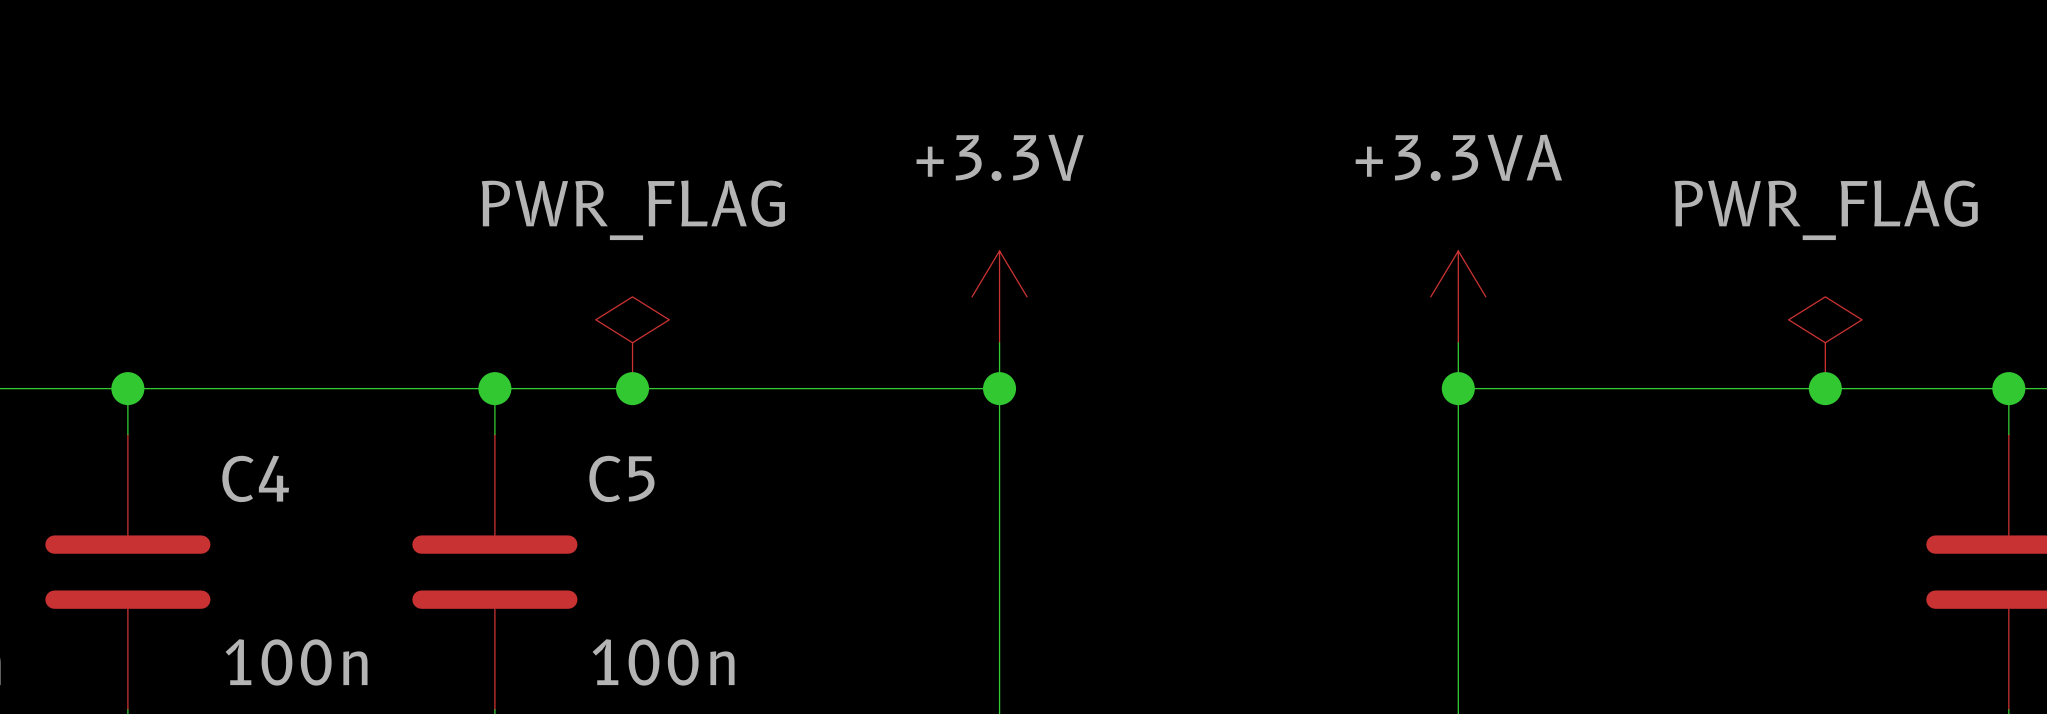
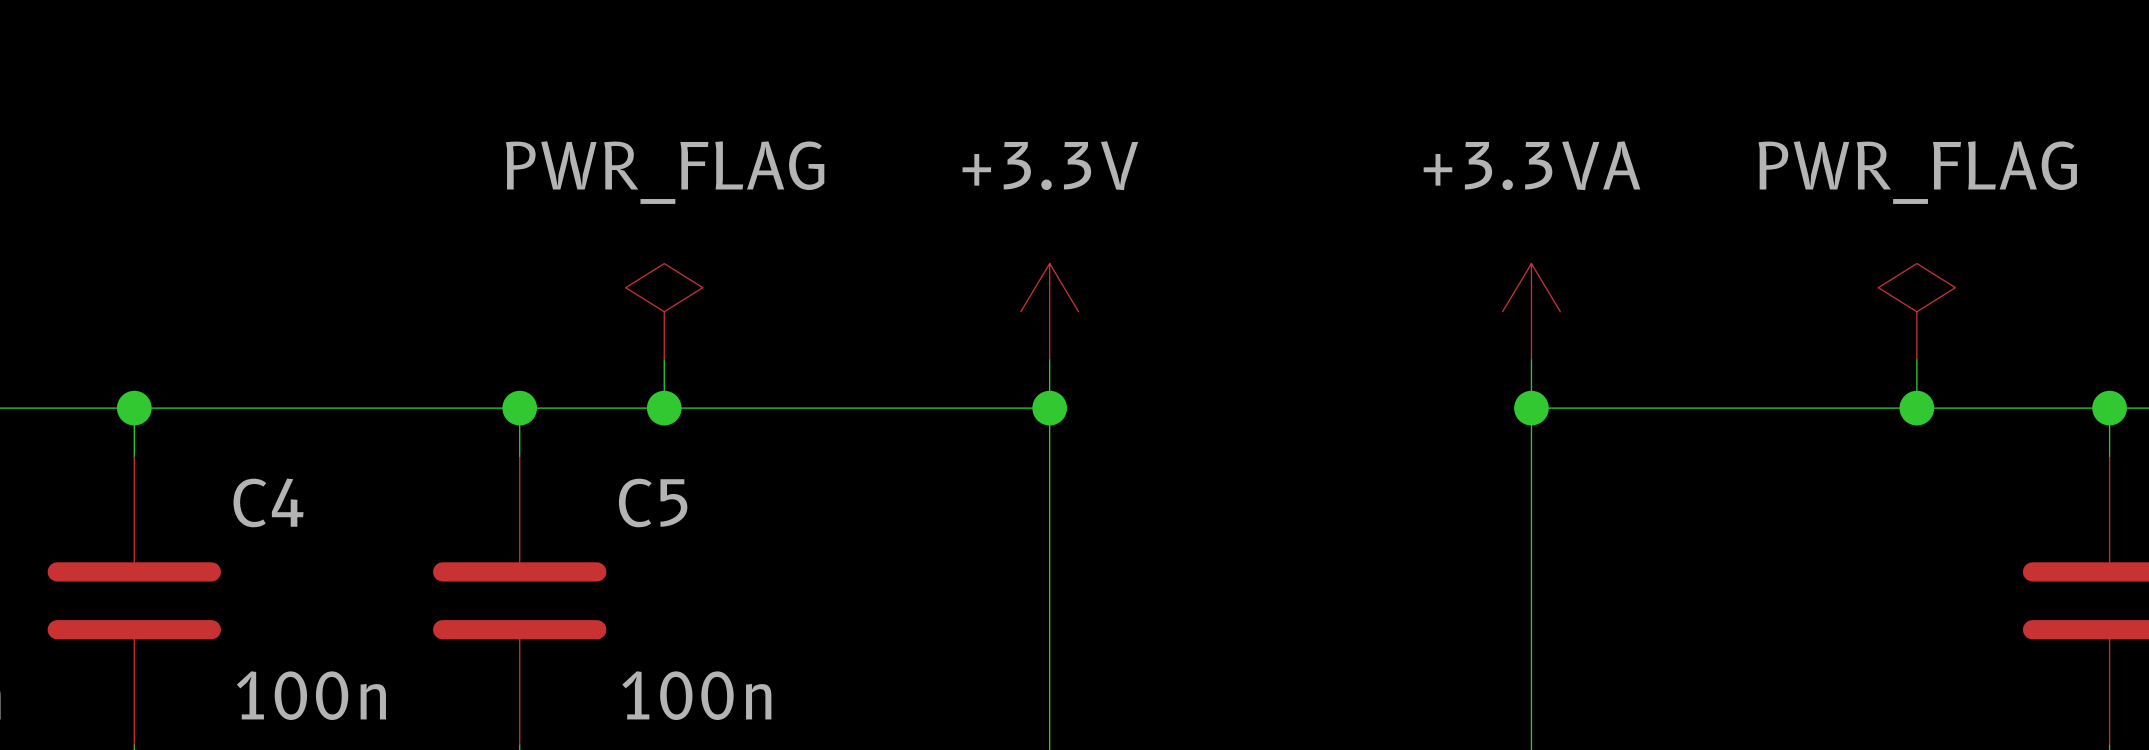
power symbol position: PWR_FLAG (632, 342) -> PWR_FLAG (664, 311)
power symbol position: PWR_FLAG (1825, 342) -> PWR_FLAG (1916, 311)

